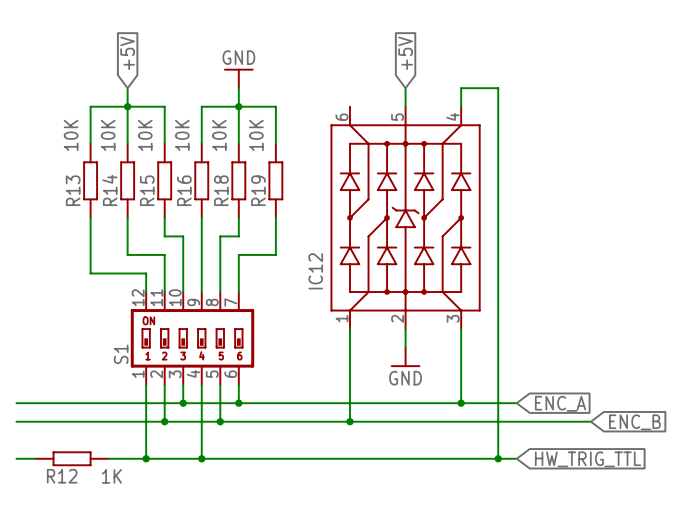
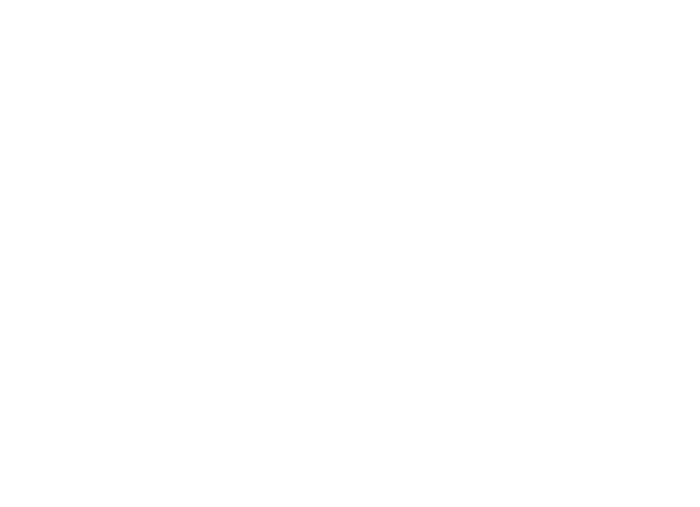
global label: +5V (127, 53) -> none
global label: +5V (405, 53) -> none
power symbol: GND (238, 78) -> none
wire: (127, 88) (127, 143) -> none
wire: (238, 88) (238, 143) -> none
wire: (405, 88) (405, 106) -> none
junction: (127, 106) -> none
junction: (238, 106) -> none
wire: (461, 106) (461, 88) (498, 88) (498, 458) -> none
wire: (90, 143) (90, 106) (164, 106) (164, 143) -> none
wire: (201, 143) (201, 106) (275, 106) (275, 143) -> none
R13: 10K (90, 180) -> none
R14: 10K (127, 180) -> none
R15: 10K (164, 180) -> none
R16: 10K (201, 180) -> none
R18: 10K (238, 180) -> none
R19: 10K (275, 180) -> none
wire: (90, 217) (90, 273) (146, 273) (146, 292) -> none
wire: (127, 217) (127, 254) (164, 254) (164, 292) -> none
wire: (164, 217) (164, 236) (183, 236) (183, 292) -> none
wire: (201, 217) (201, 292) -> none
wire: (238, 217) (238, 236) (220, 236) (220, 292) -> none
wire: (275, 217) (275, 254) (238, 254) (238, 292) -> none
IC12: (405, 217) -> none
wire: (349, 329) (349, 421) -> none
wire: (405, 329) (405, 347) -> none
wire: (461, 329) (461, 403) -> none
S1: (192, 338) -> none
power symbol: GND (405, 357) -> none
wire: (146, 384) (146, 458) -> none
wire: (164, 384) (164, 421) -> none
wire: (183, 384) (183, 403) -> none
wire: (201, 384) (201, 458) -> none
wire: (220, 384) (220, 421) -> none
wire: (238, 384) (238, 403) -> none
wire: (16, 403) (516, 403) -> none
junction: (183, 403) -> none
junction: (238, 403) -> none
junction: (461, 403) -> none
global label: ENC_A (560, 403) -> none
wire: (16, 421) (590, 421) -> none
junction: (164, 421) -> none
junction: (220, 421) -> none
junction: (349, 421) -> none
global label: ENC_B (634, 422) -> none
wire: (16, 458) (34, 458) -> none
R12: 1K (72, 458) -> none
wire: (109, 458) (516, 458) -> none
junction: (146, 458) -> none
junction: (201, 458) -> none
junction: (498, 458) -> none
global label: HW_TRIG_TTL (588, 459) -> none

